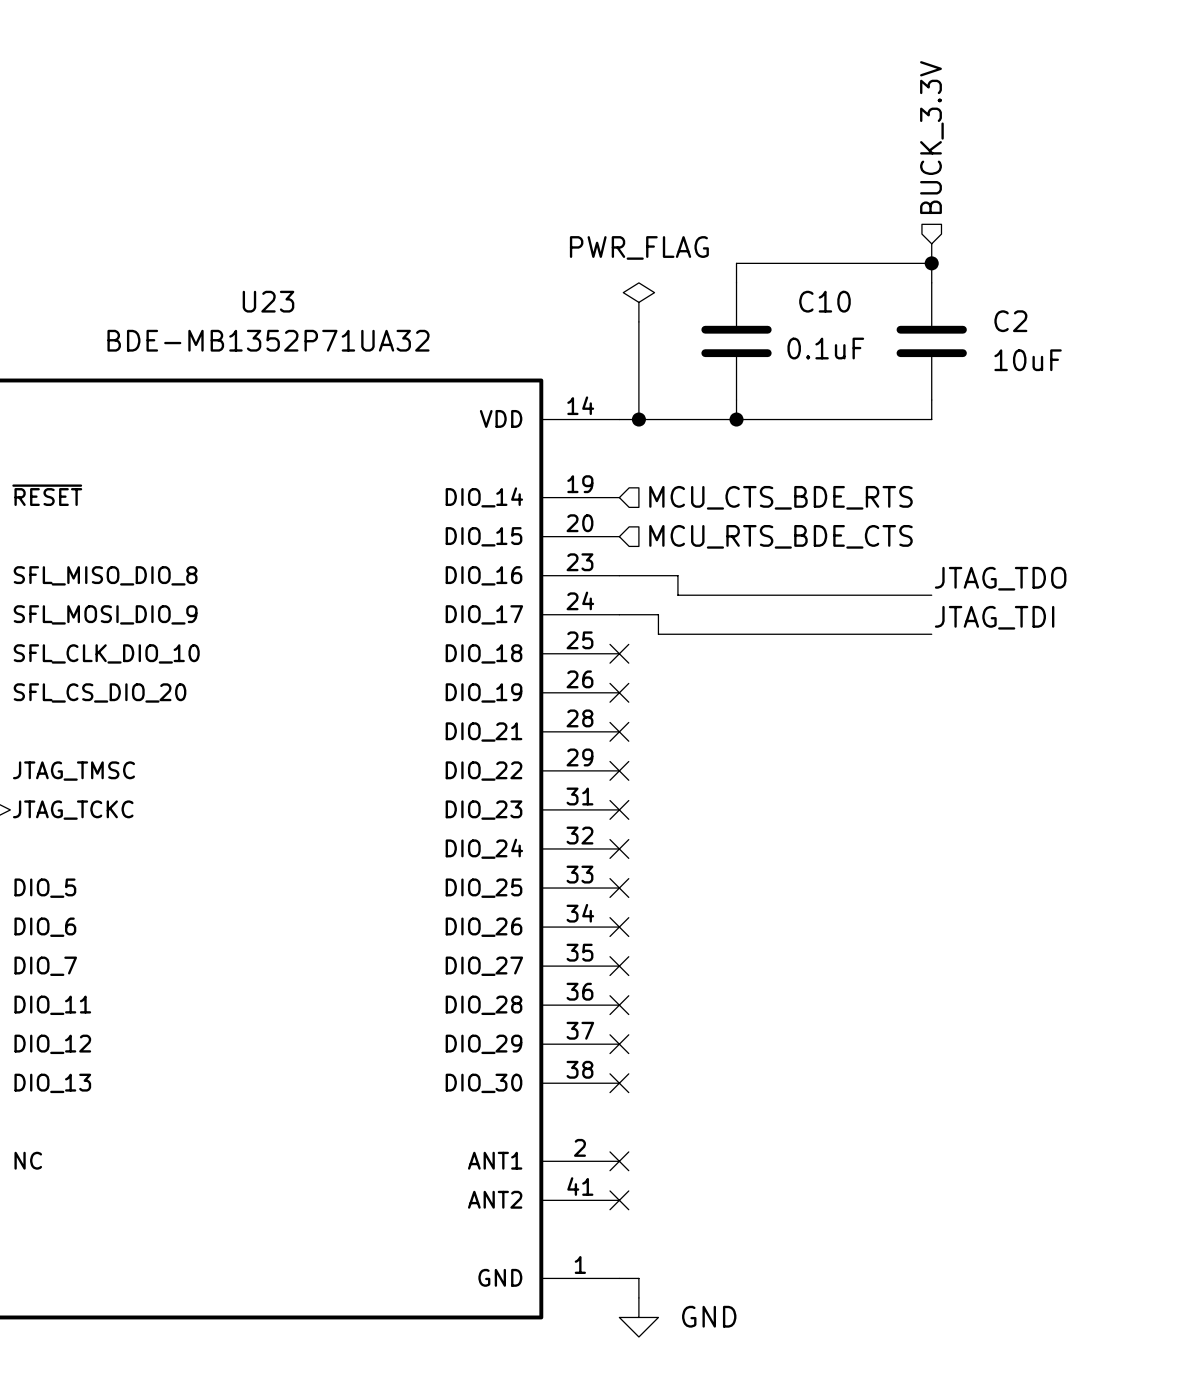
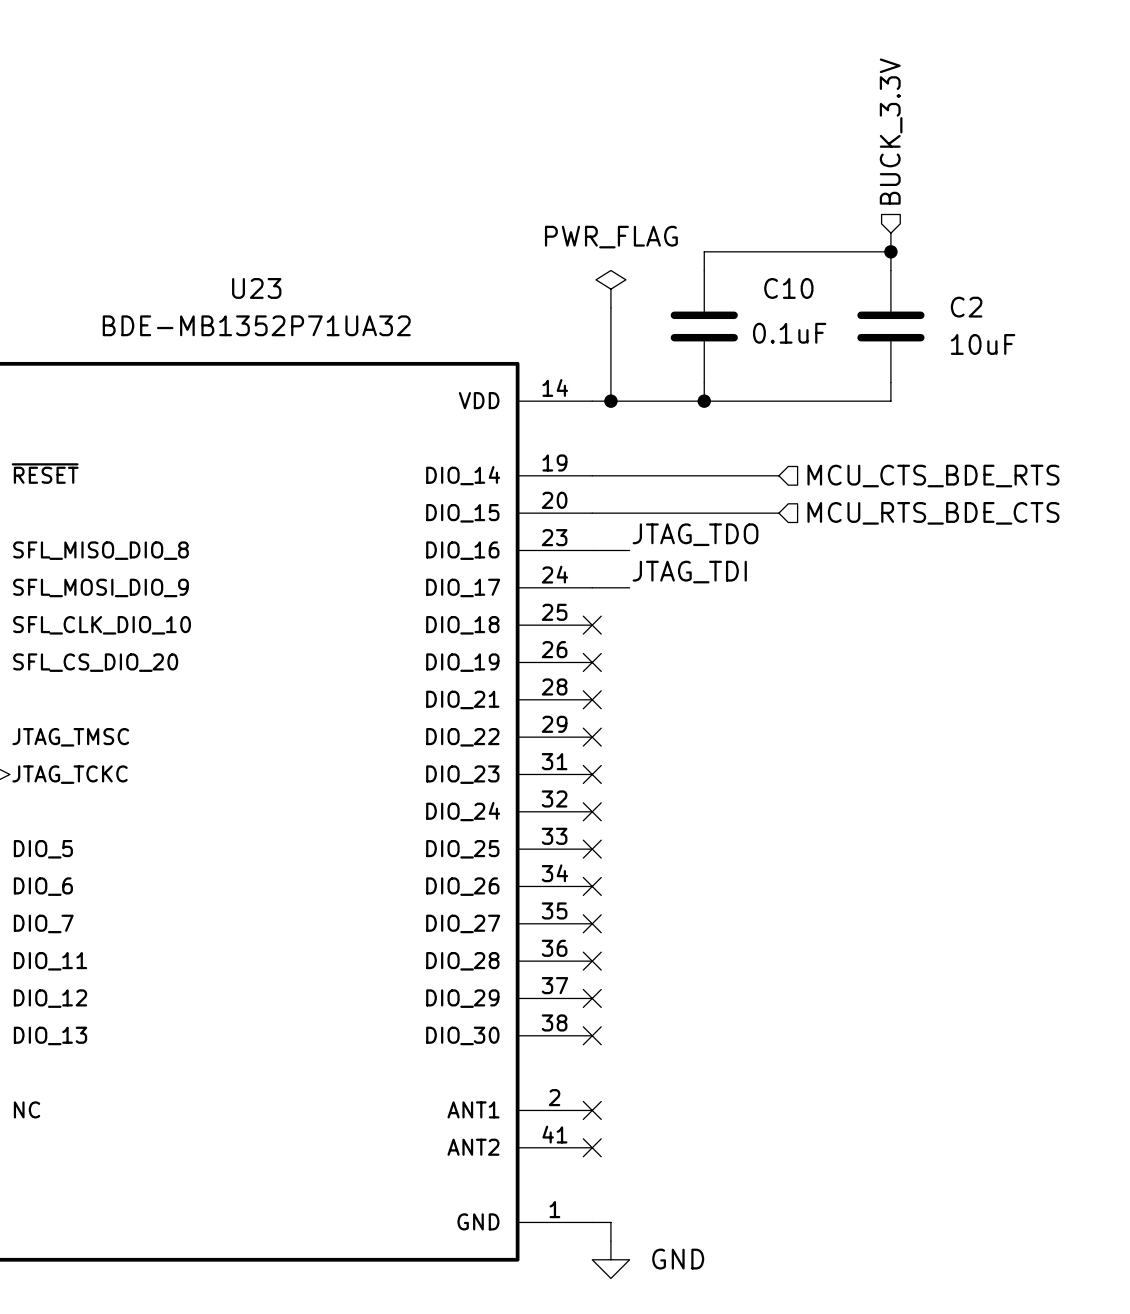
wire: none -> (592, 475) (778, 475)
hierarchical label position: MCU_CTS_BDE_RTS (780, 497) -> MCU_CTS_BDE_RTS (933, 476)
wire: none -> (592, 513) (778, 513)
hierarchical label position: MCU_RTS_BDE_CTS (780, 536) -> MCU_RTS_BDE_CTS (933, 513)
wire: (658, 575) (677, 575) (677, 595) (931, 595) -> none
label position: JTAG_TDO (1000, 578) -> JTAG_TDO (695, 534)
wire: (658, 614) (658, 634) (931, 634) -> none
label position: JTAG_TDI (994, 617) -> JTAG_TDI (689, 572)

